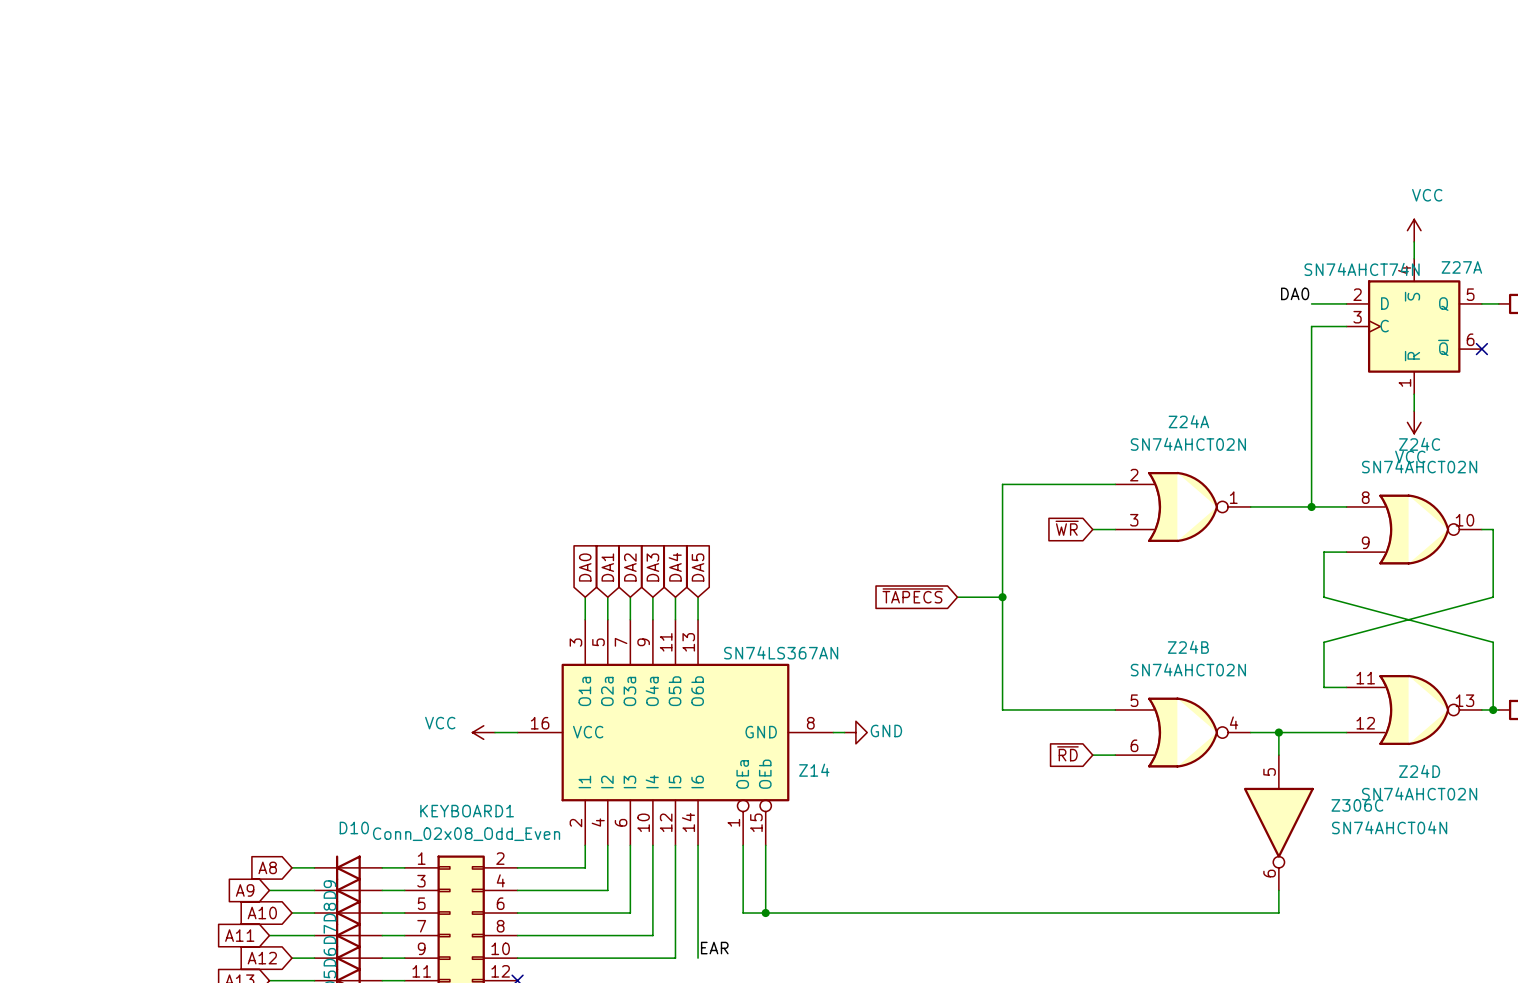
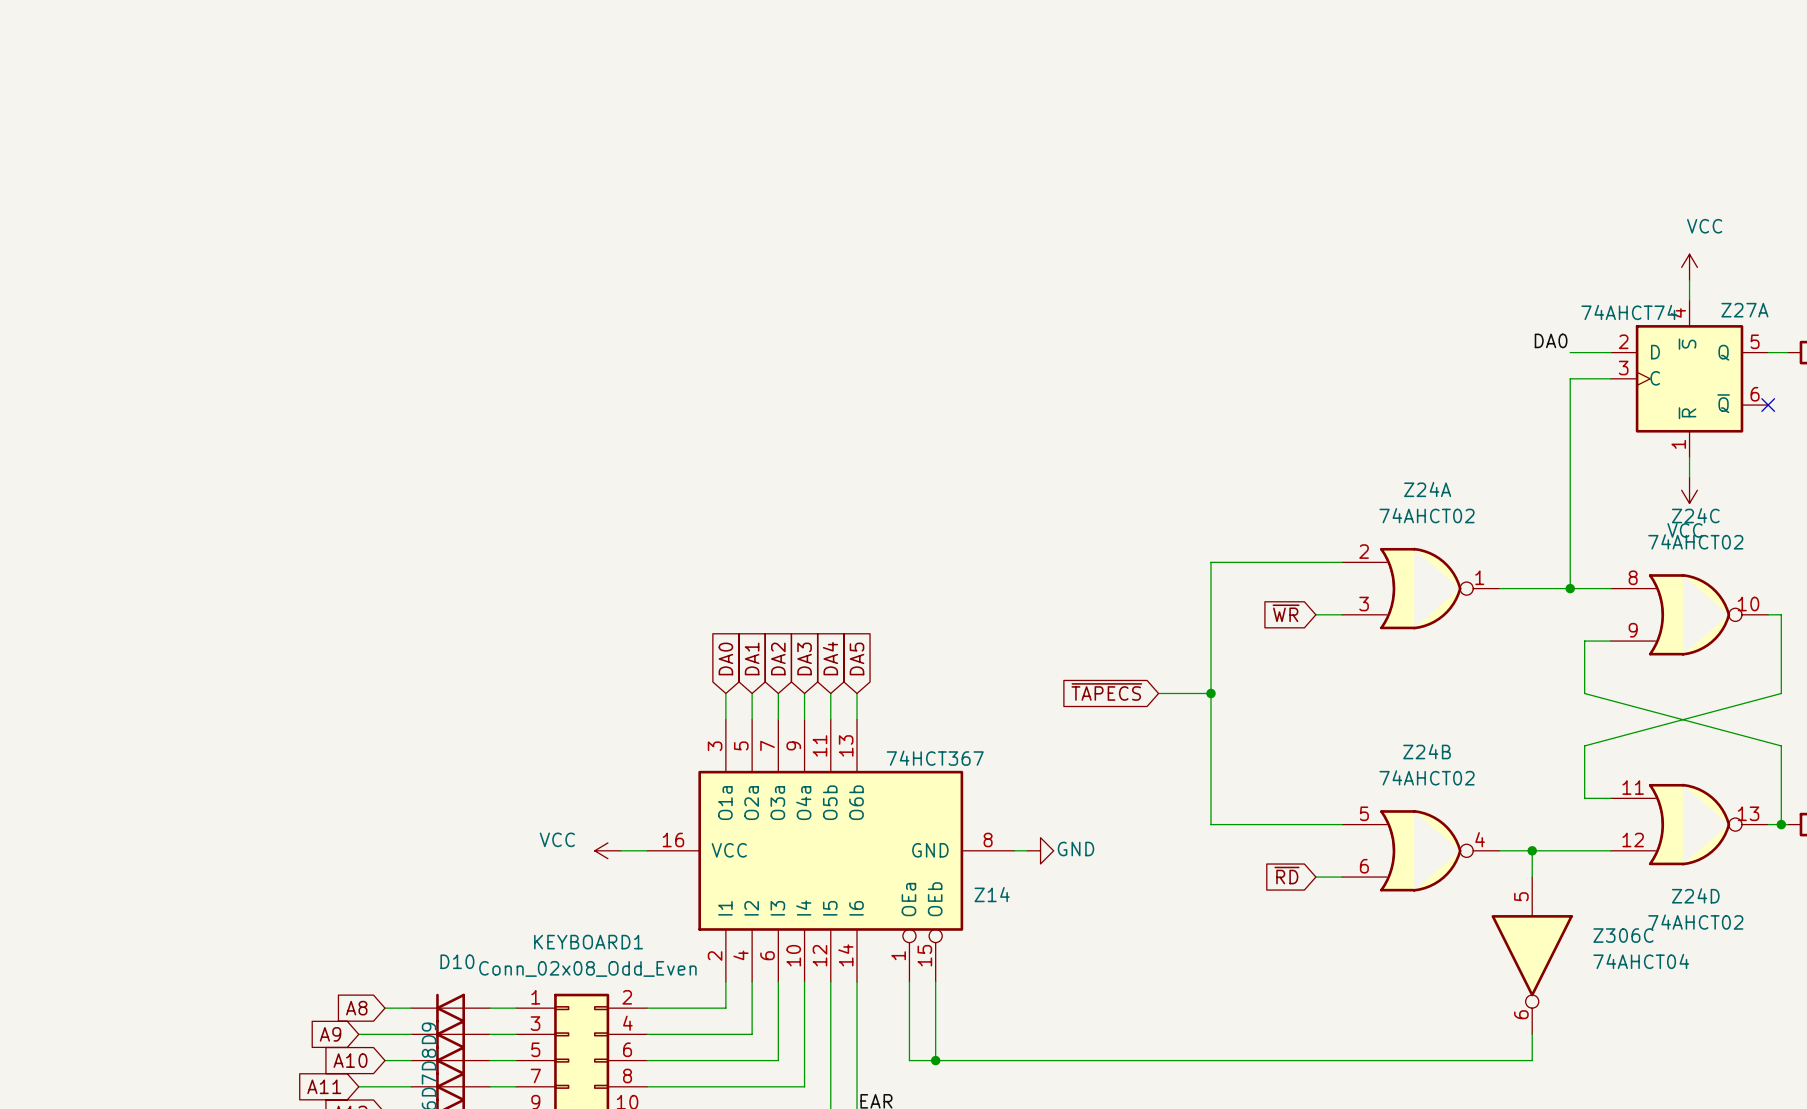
Z27A value: SN74AHCT74N (1362, 269) -> 74AHCT74 (1629, 312)
Z24A value: SN74AHCT02N (1188, 444) -> 74AHCT02 (1427, 515)
Z24C value: SN74AHCT02N (1419, 466) -> 74AHCT02 (1695, 541)
Z14 value: SN74LS367AN (781, 652) -> 74HCT367 (935, 758)
Z24B value: SN74AHCT02N (1188, 669) -> 74AHCT02 (1427, 777)
Z24D value: SN74AHCT02N (1419, 793) -> 74AHCT02 (1695, 922)
Z306C value: SN74AHCT04N (1389, 827) -> 74AHCT04 (1641, 961)

